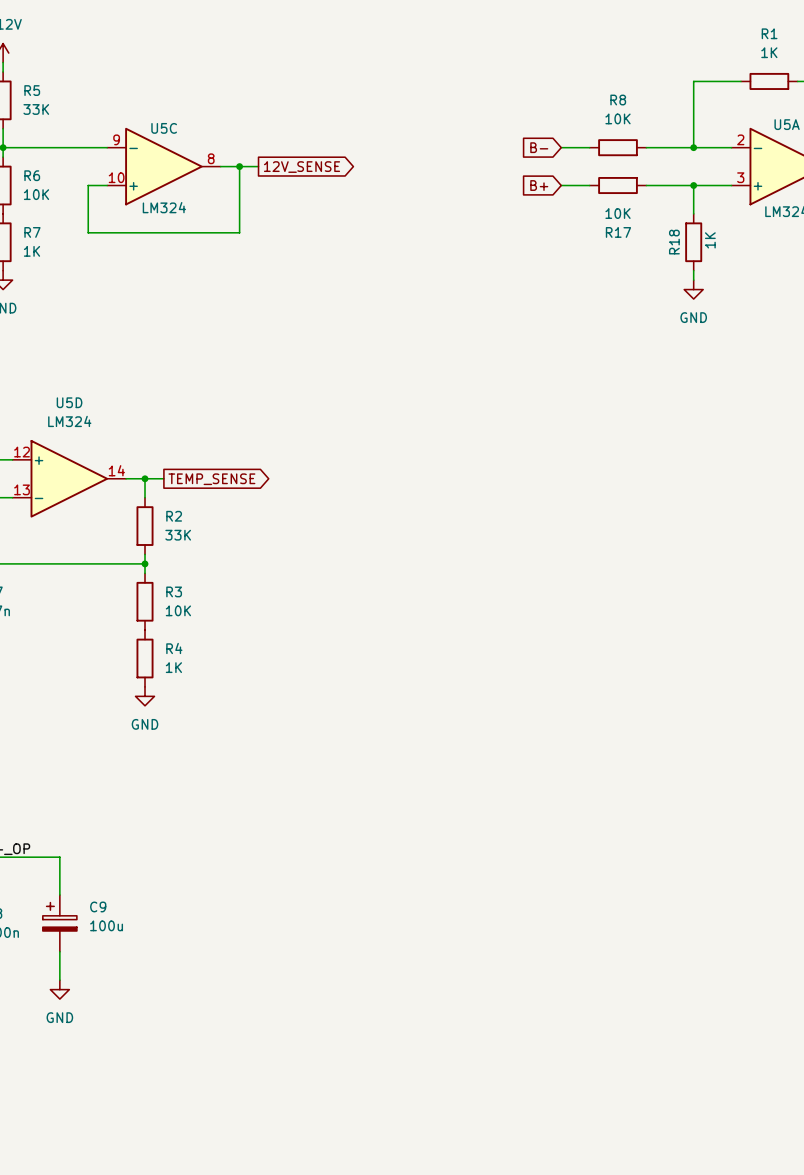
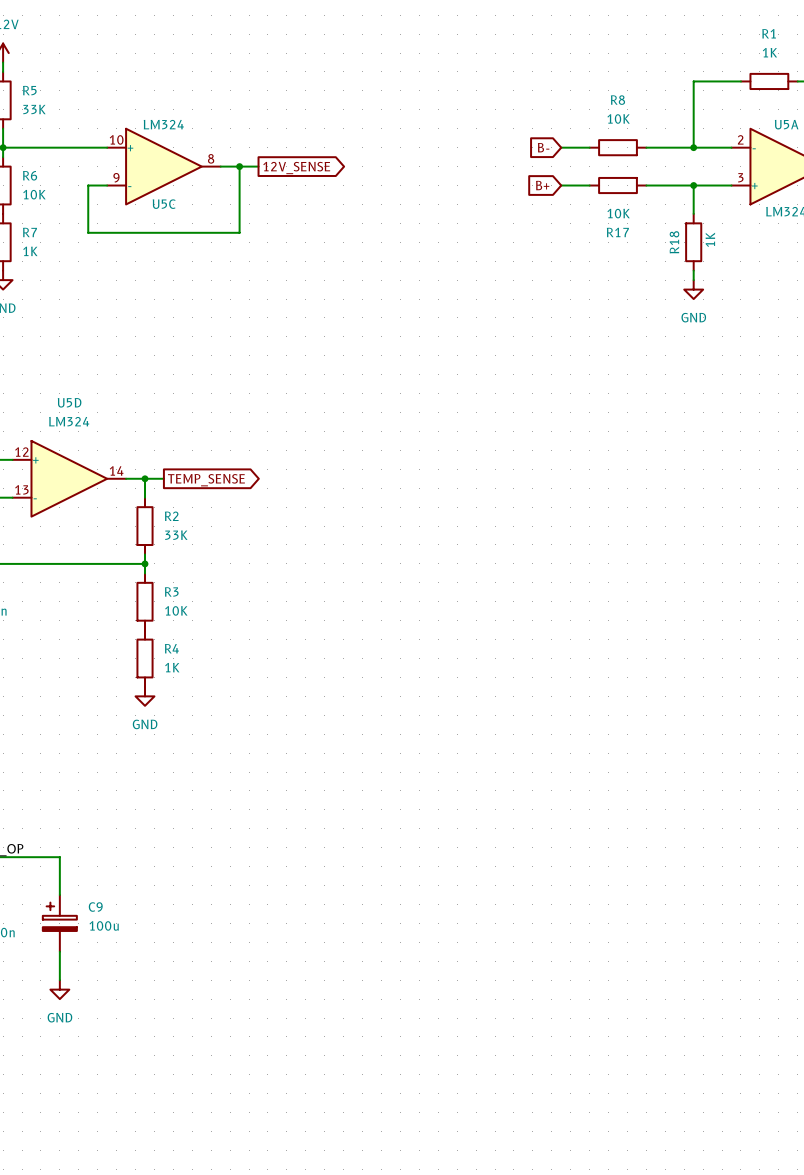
U5C flip: as is (163, 166) -> up-down (163, 166)

